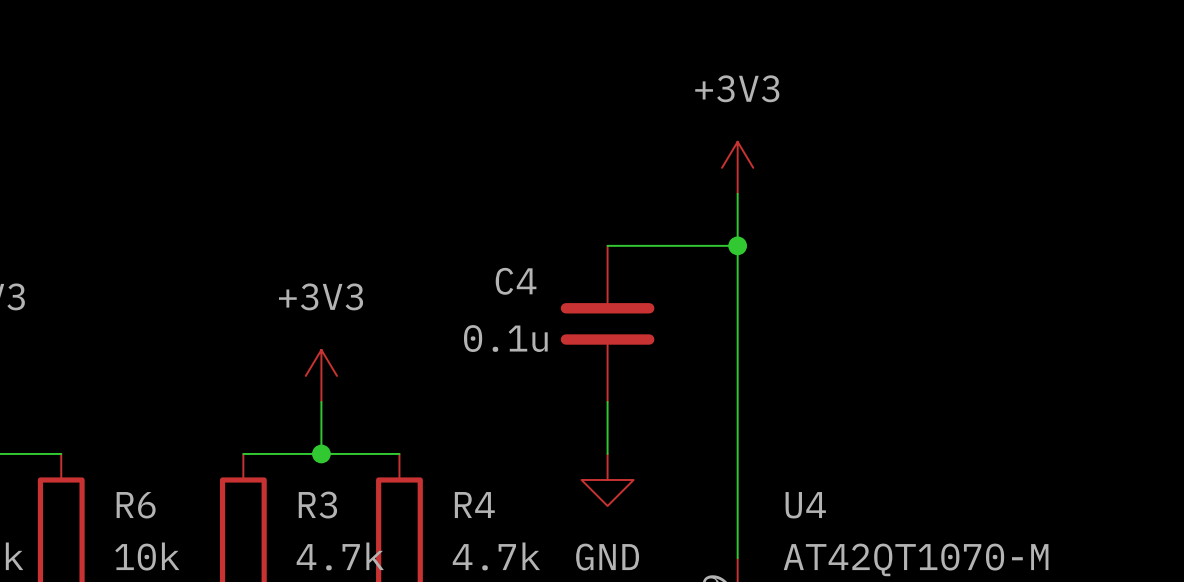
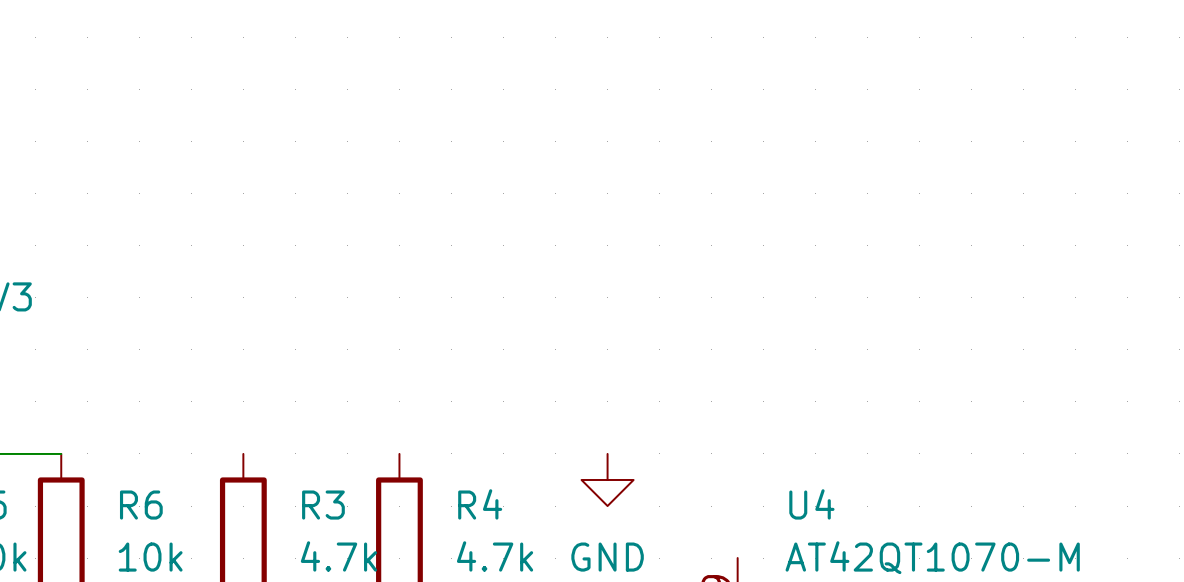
power symbol: +3V3 (737, 167) -> none
wire: (737, 193) (737, 558) -> none
wire: (607, 245) (737, 245) -> none
junction: (737, 245) -> none
C4: 0.1u (607, 323) -> none
power symbol: +3V3 (321, 375) -> none
wire: (321, 401) (321, 453) -> none
wire: (607, 401) (607, 453) -> none
wire: (243, 453) (399, 453) -> none
junction: (321, 453) -> none

